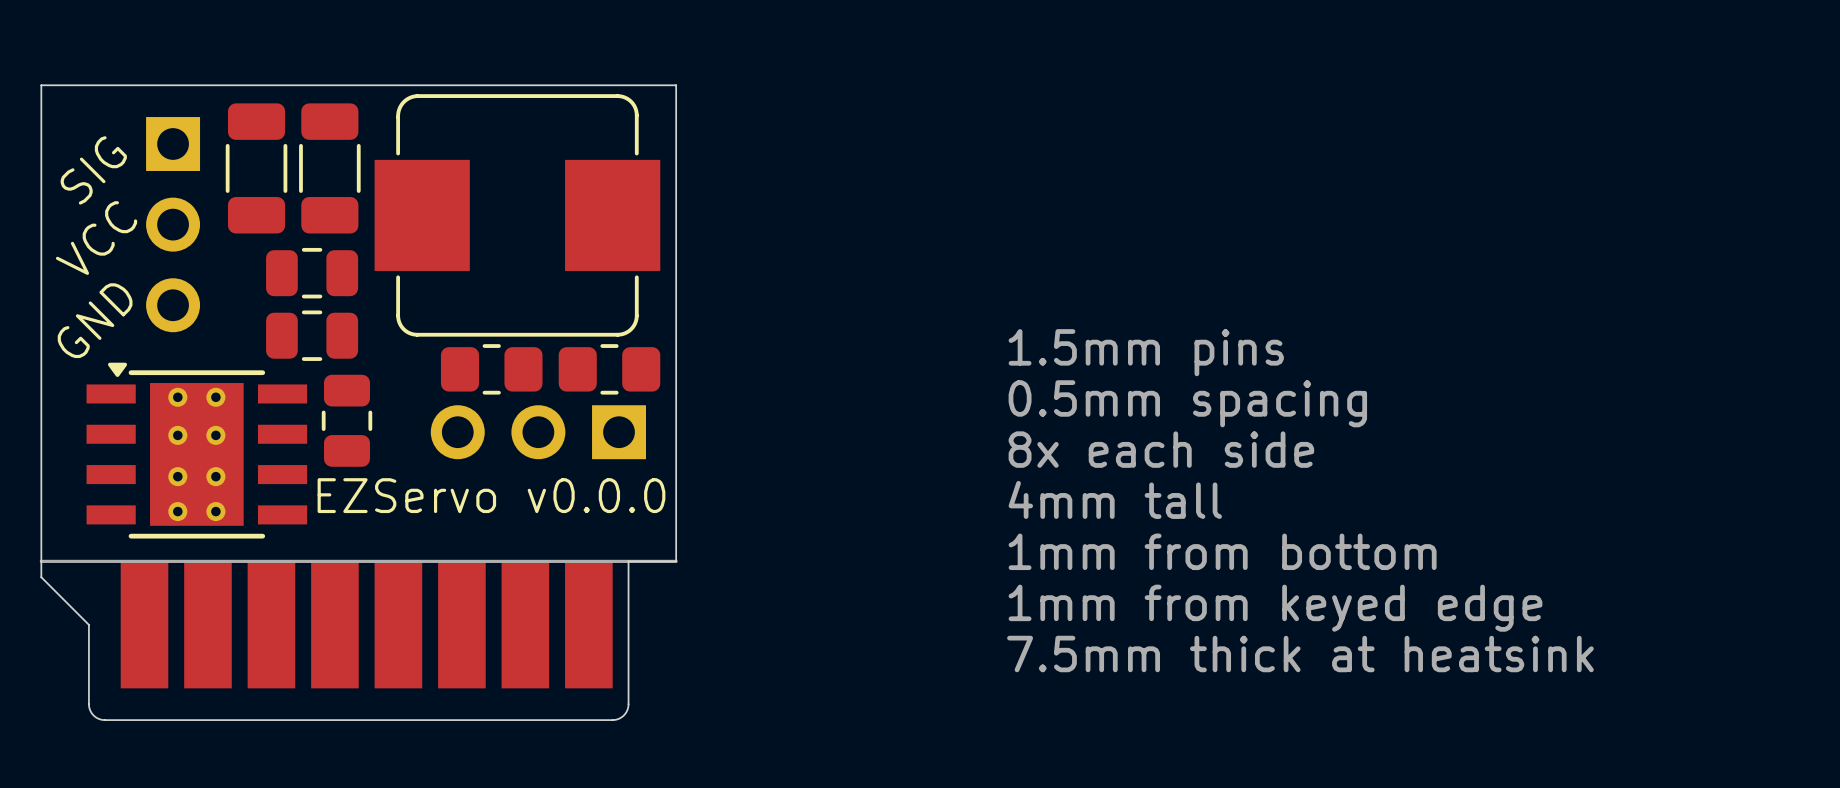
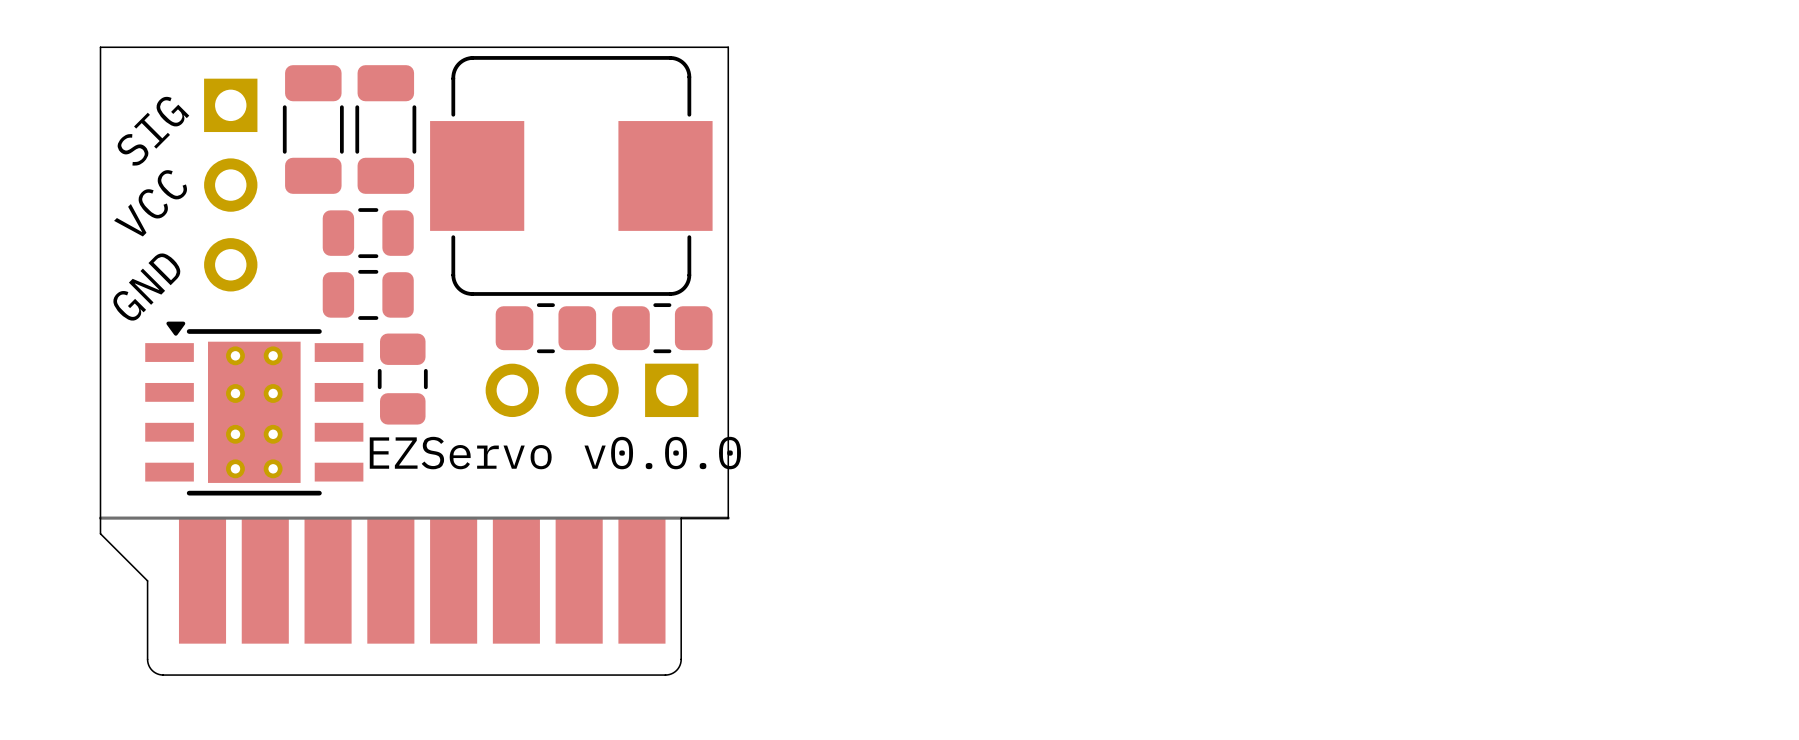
text: 1.5mm pins (1146, 352) -> none
text: 0.5mm spacing (1187, 403) -> none
text: 8x each side (1161, 449) -> none
text: 4mm tall (1115, 499) -> none
text: 1mm from bottom (1222, 551) -> none
text: 1mm from keyed edge (1275, 608) -> none
text: 7.5mm thick at heatsink (1300, 654) -> none

